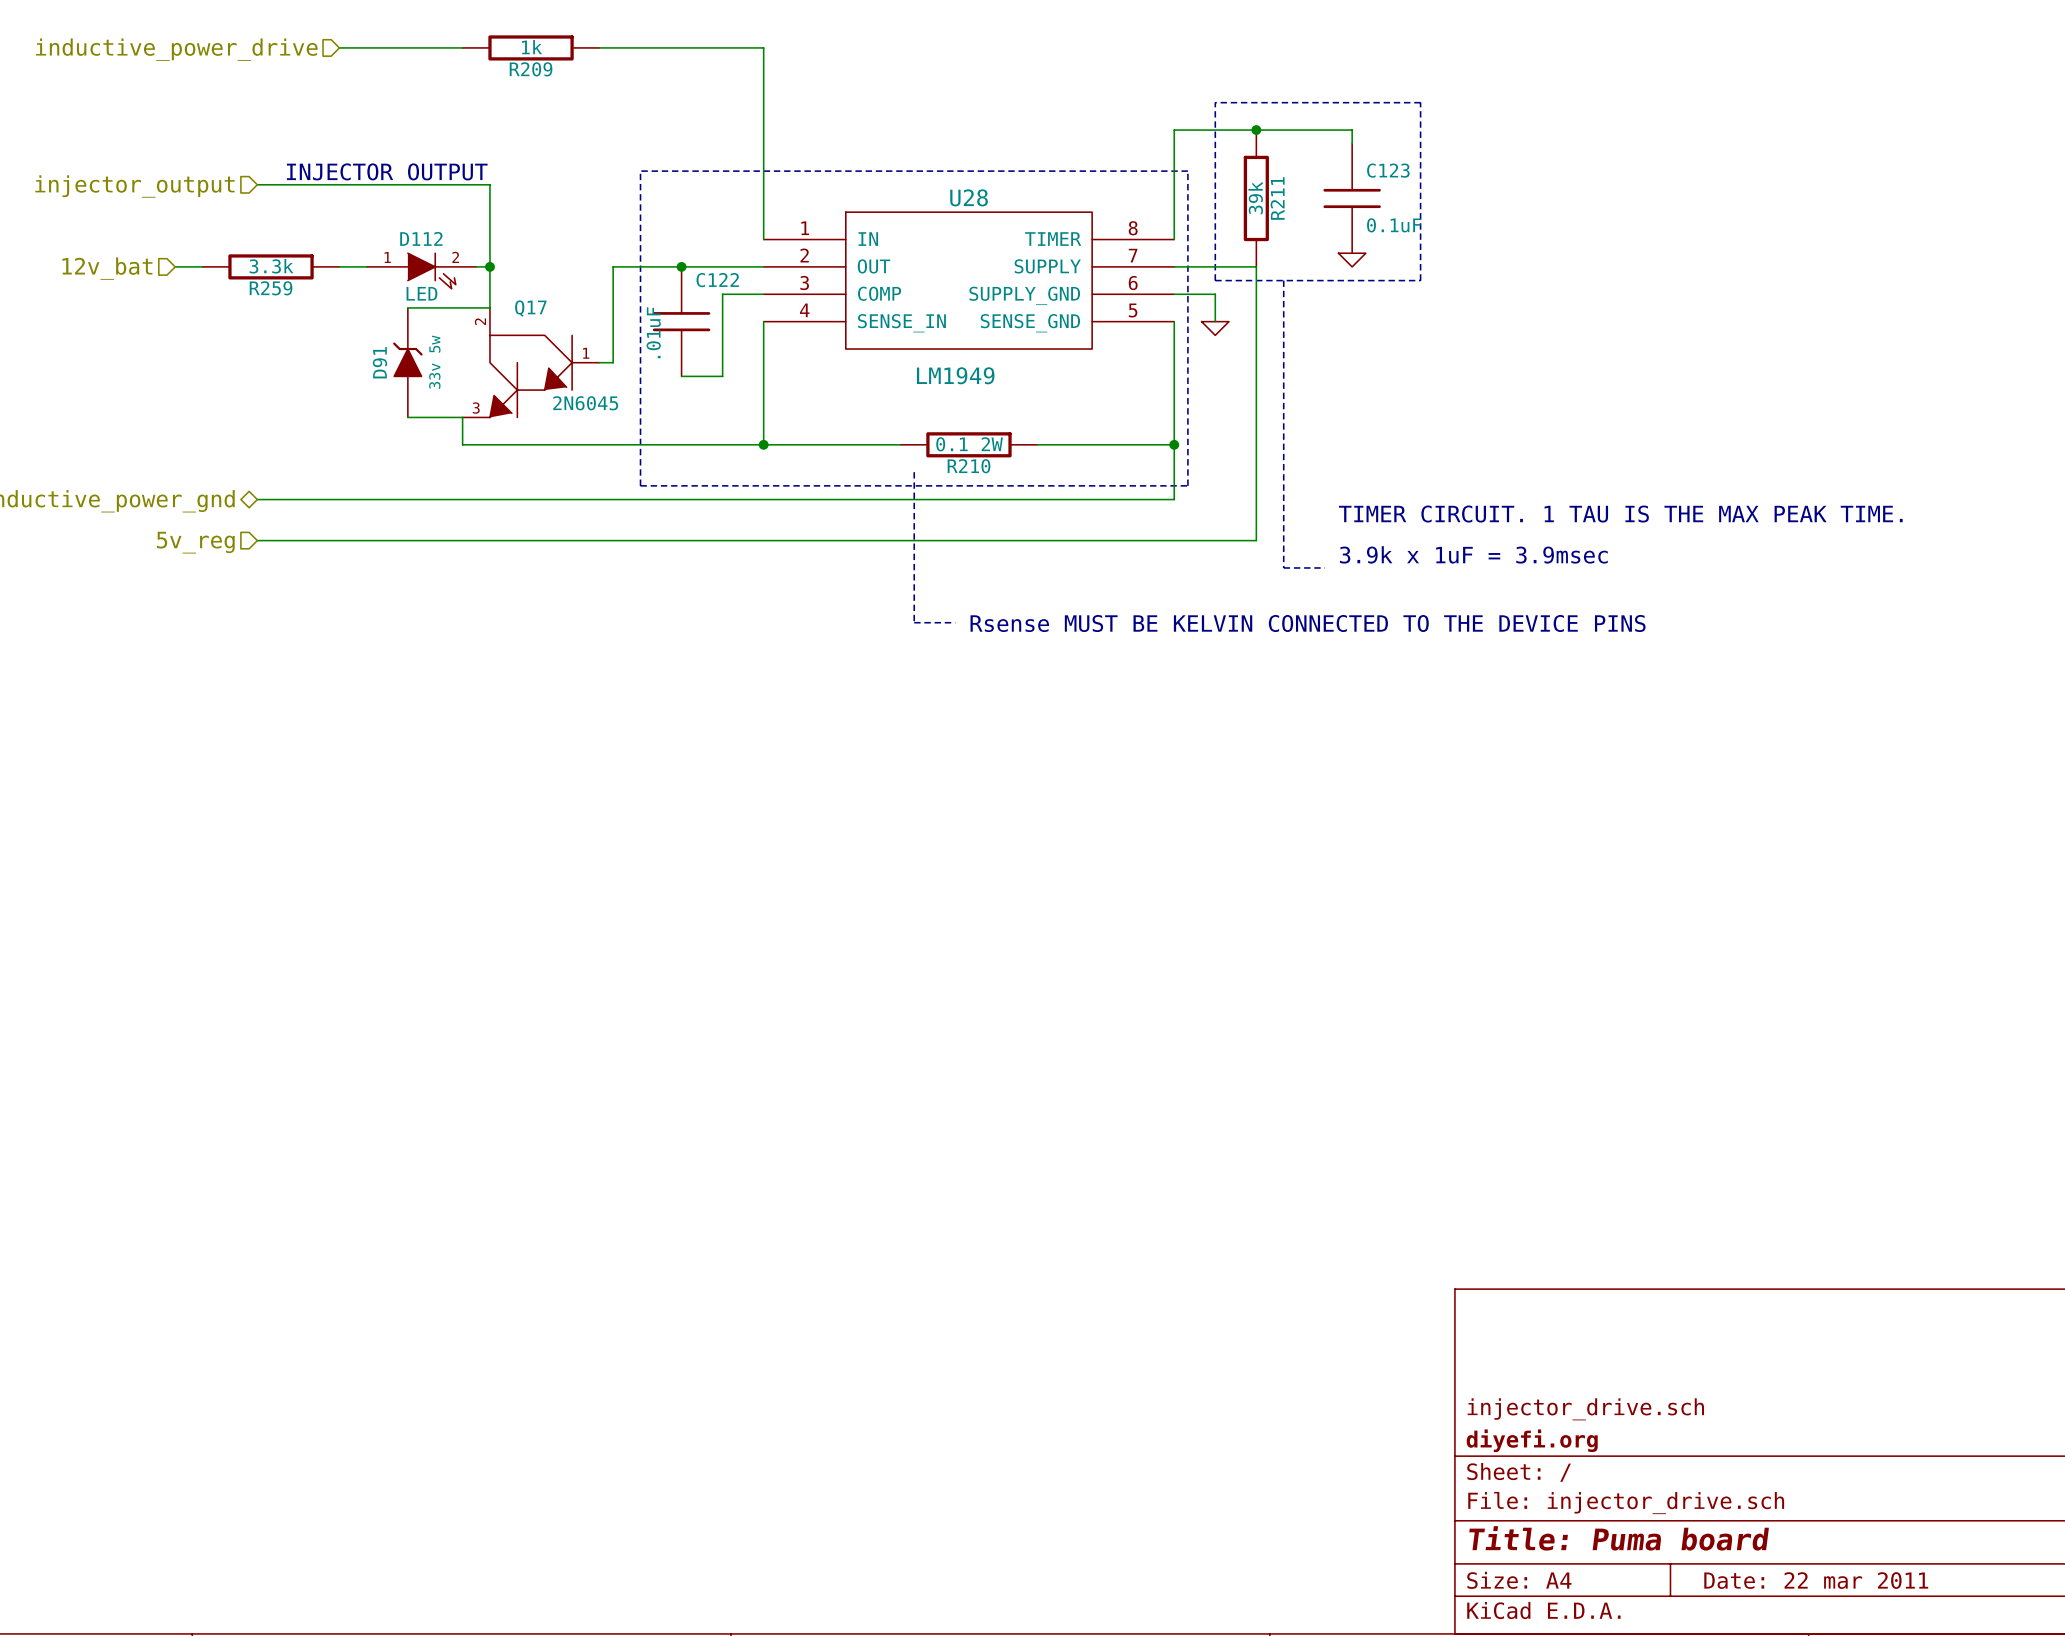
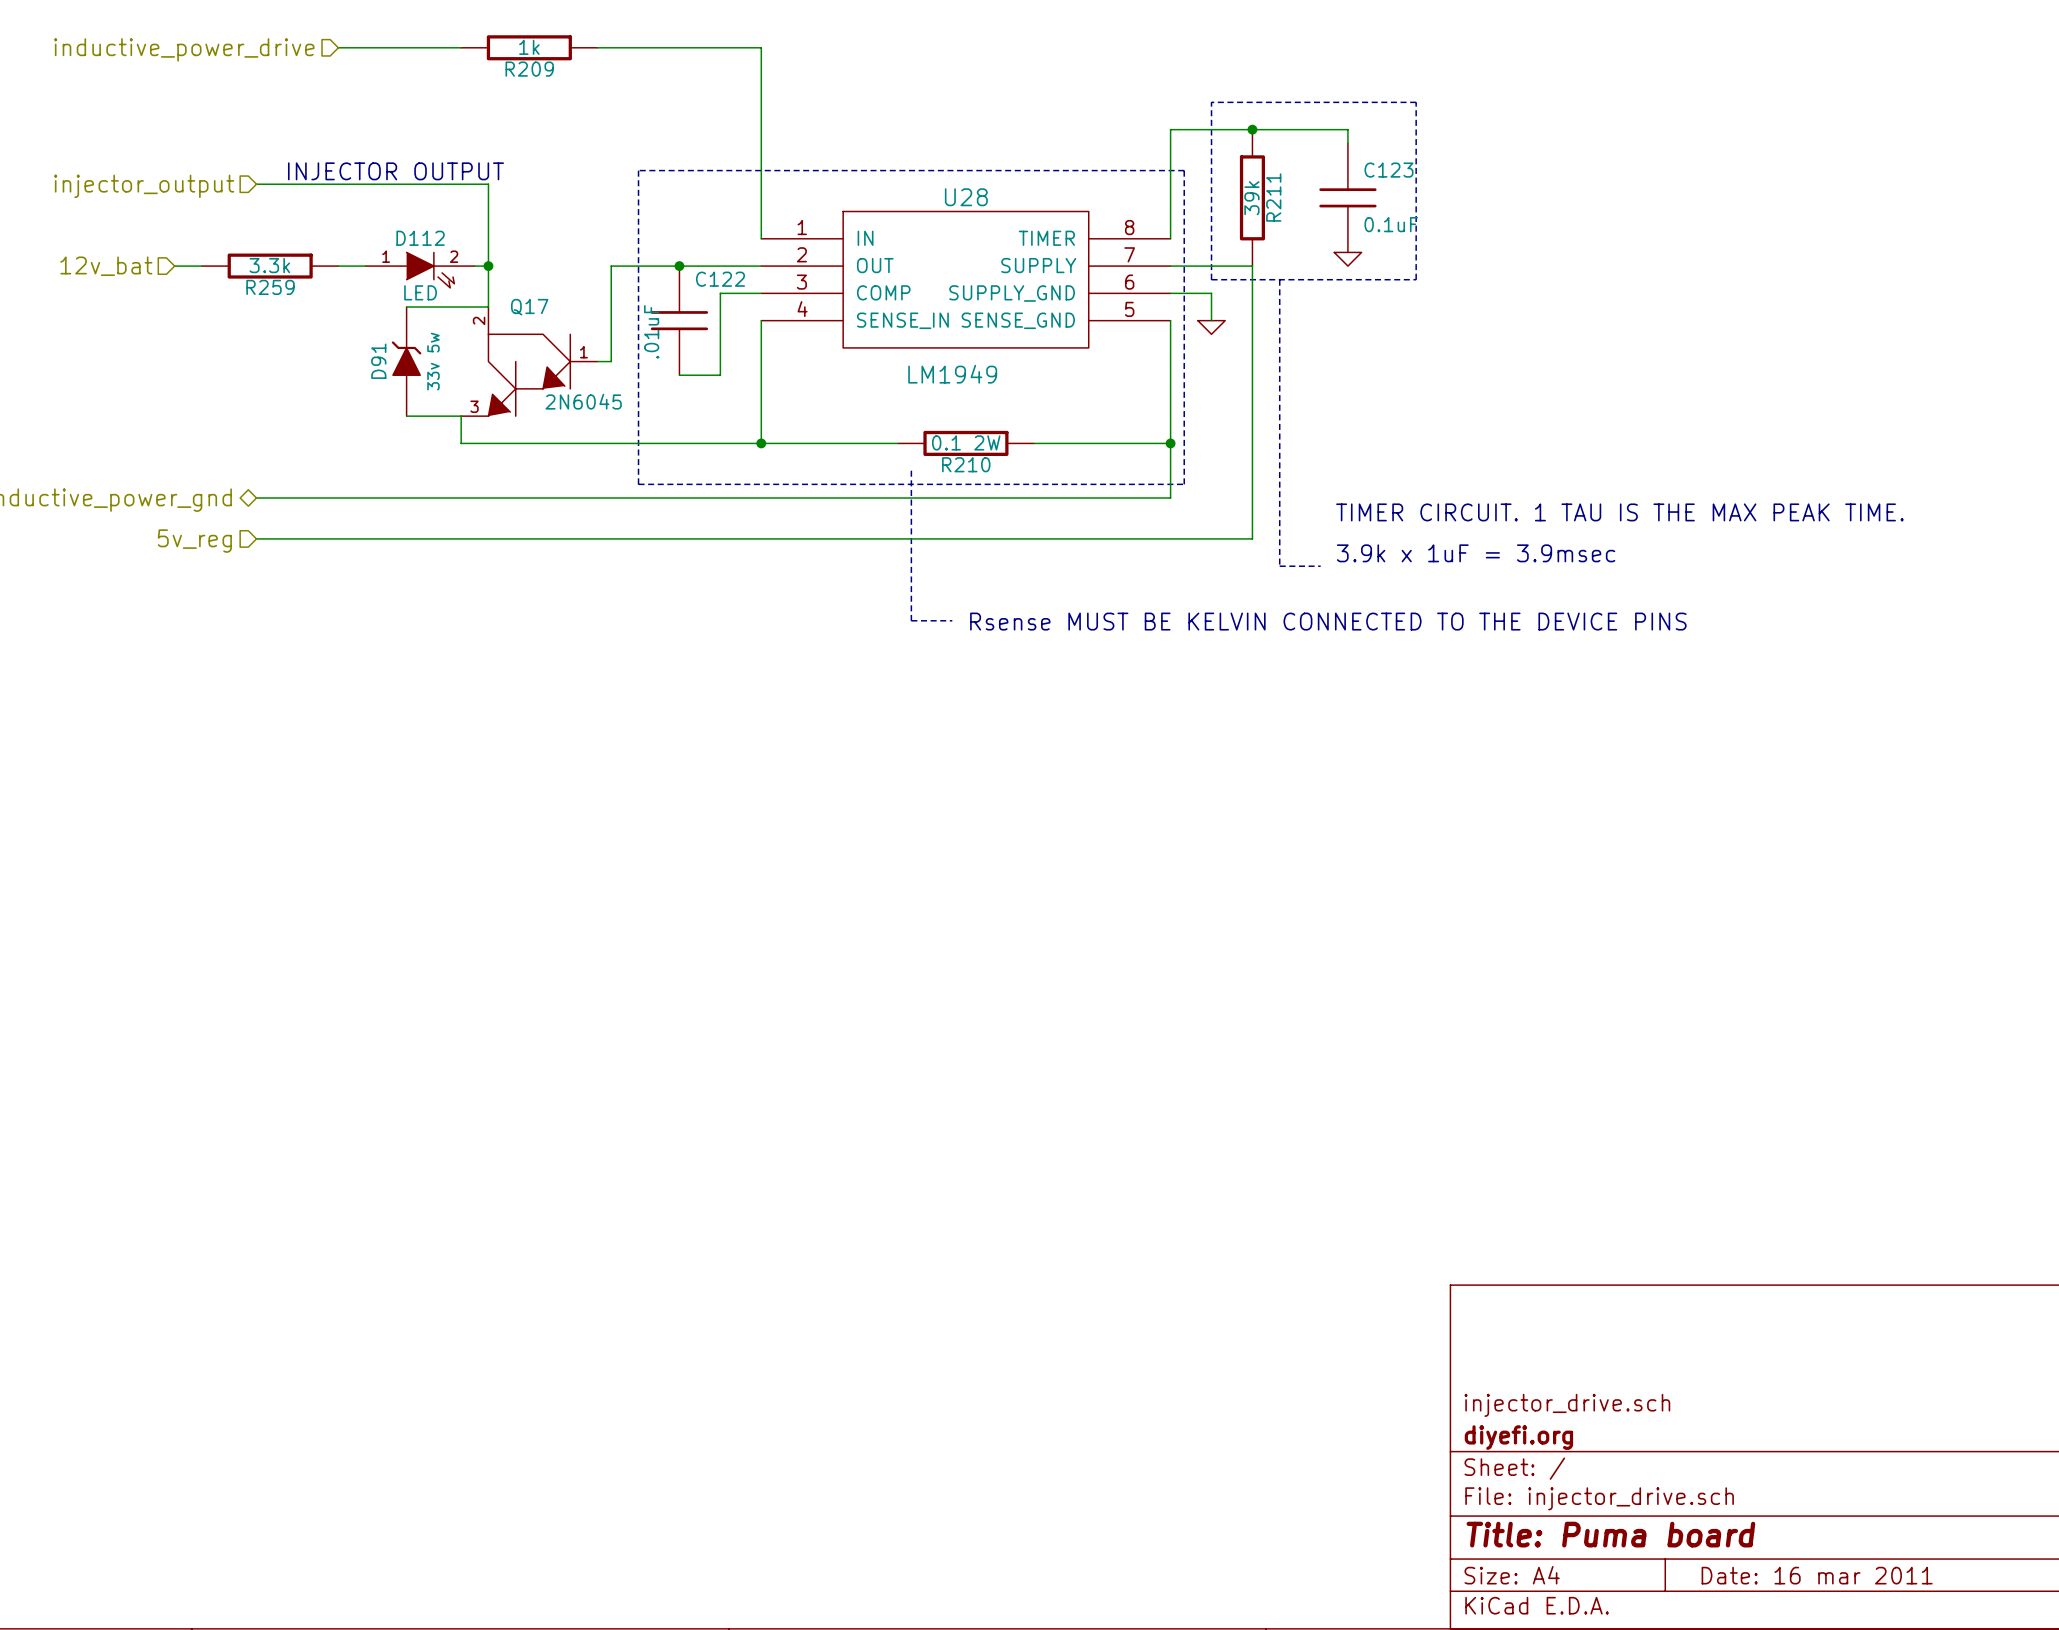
title block: Date: 22 mar 2011 (1816, 1580) -> Date: 16 mar 2011 (1817, 1575)

